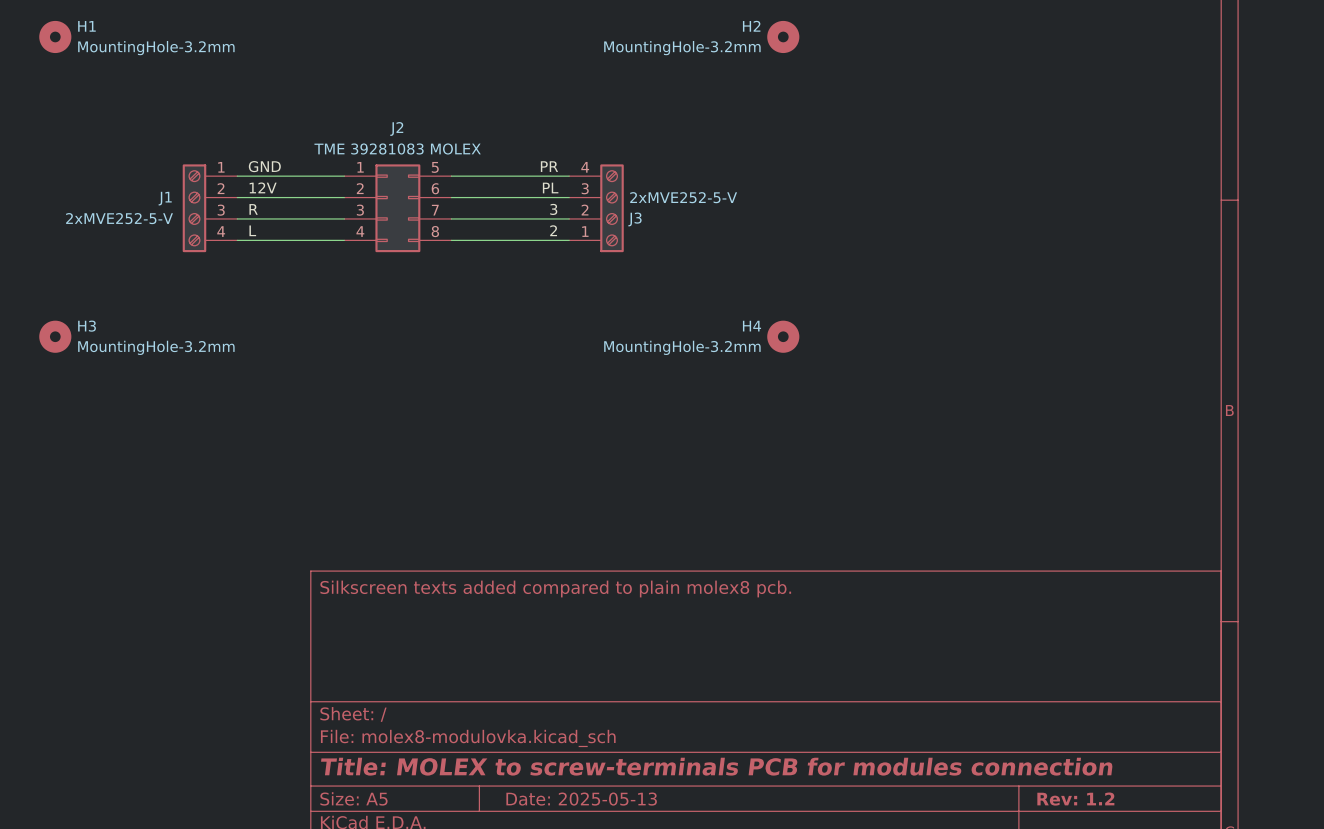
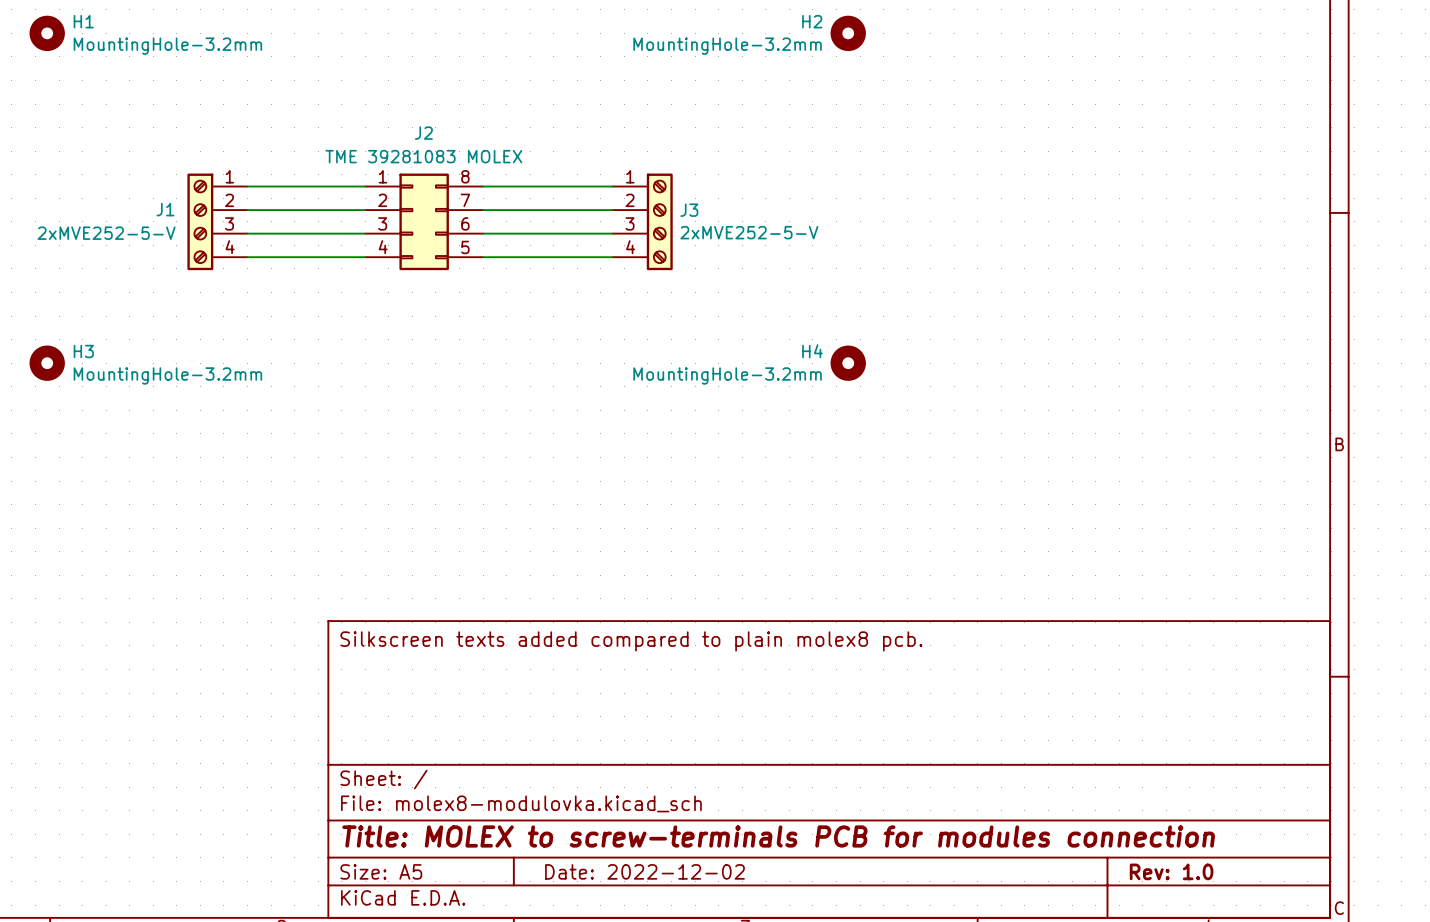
label: GND (264, 166) -> none
label: PR (549, 166) -> none
J2 pin number: 5 (435, 167) -> 8 (465, 176)
label: 12V (263, 187) -> none
J2 pin number: 6 (435, 188) -> 7 (465, 200)
label: PL (550, 188) -> none
J3 flip: as is (611, 208) -> up-down (659, 221)
label: R (253, 209) -> none
label: 3 (553, 209) -> none
J2 pin number: 7 (435, 210) -> 6 (465, 223)
label: L (252, 230) -> none
label: 2 (553, 230) -> none
J2 pin number: 8 (435, 231) -> 5 (465, 247)
title block: Date: 2025-05-13 (581, 799) -> Date: 2022-12-02 (644, 871)
title block: Rev: 1.2 (1075, 799) -> Rev: 1.0 (1171, 871)

